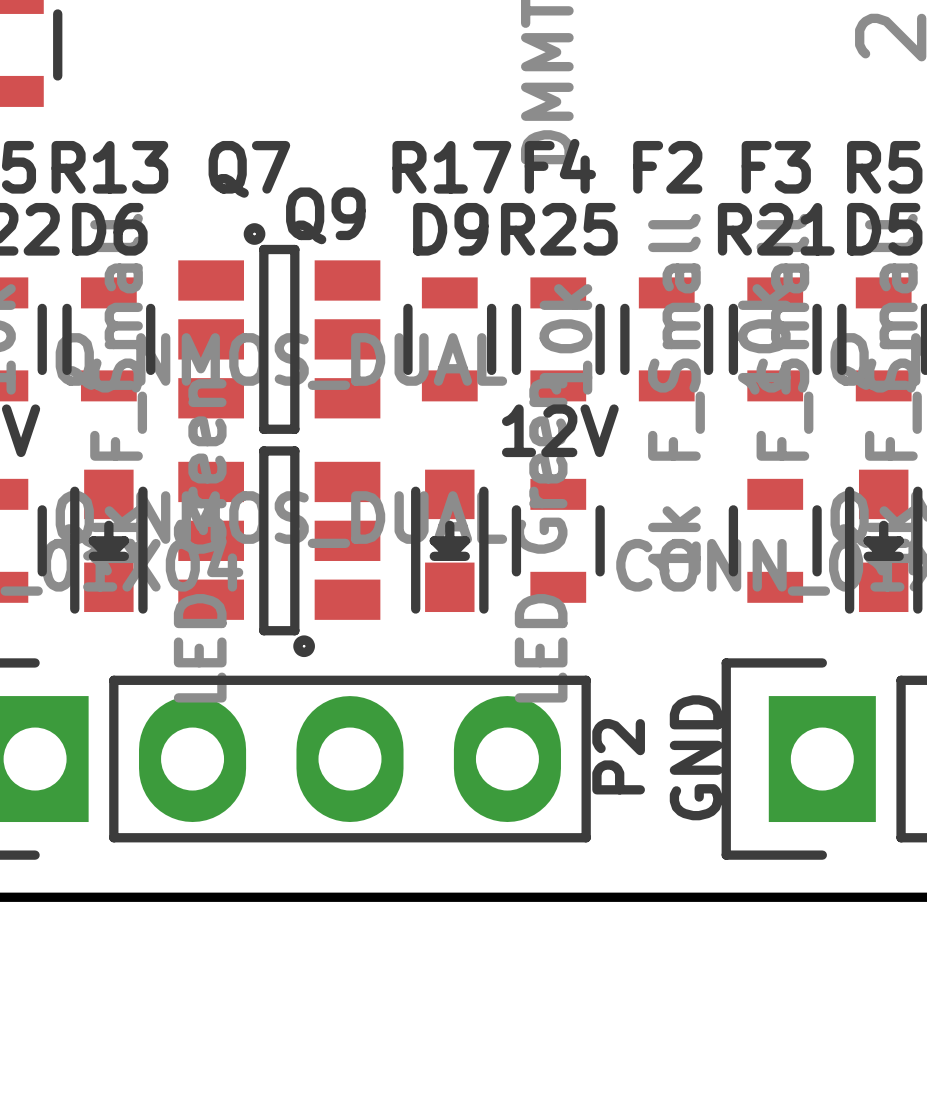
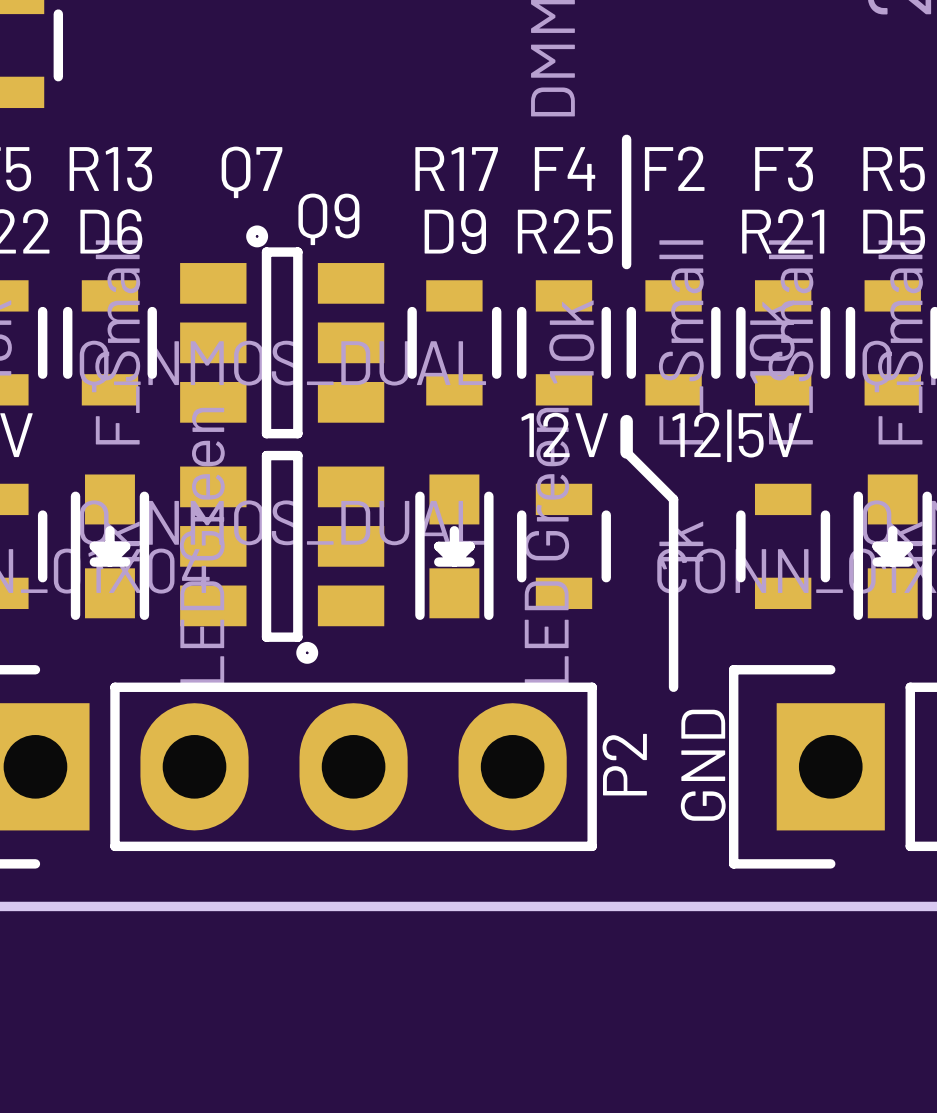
line: none -> (626, 139) (626, 264)
line: none -> (626, 421) (626, 452) (673, 499) (673, 687)
text: none -> 12|5V (736, 435)

